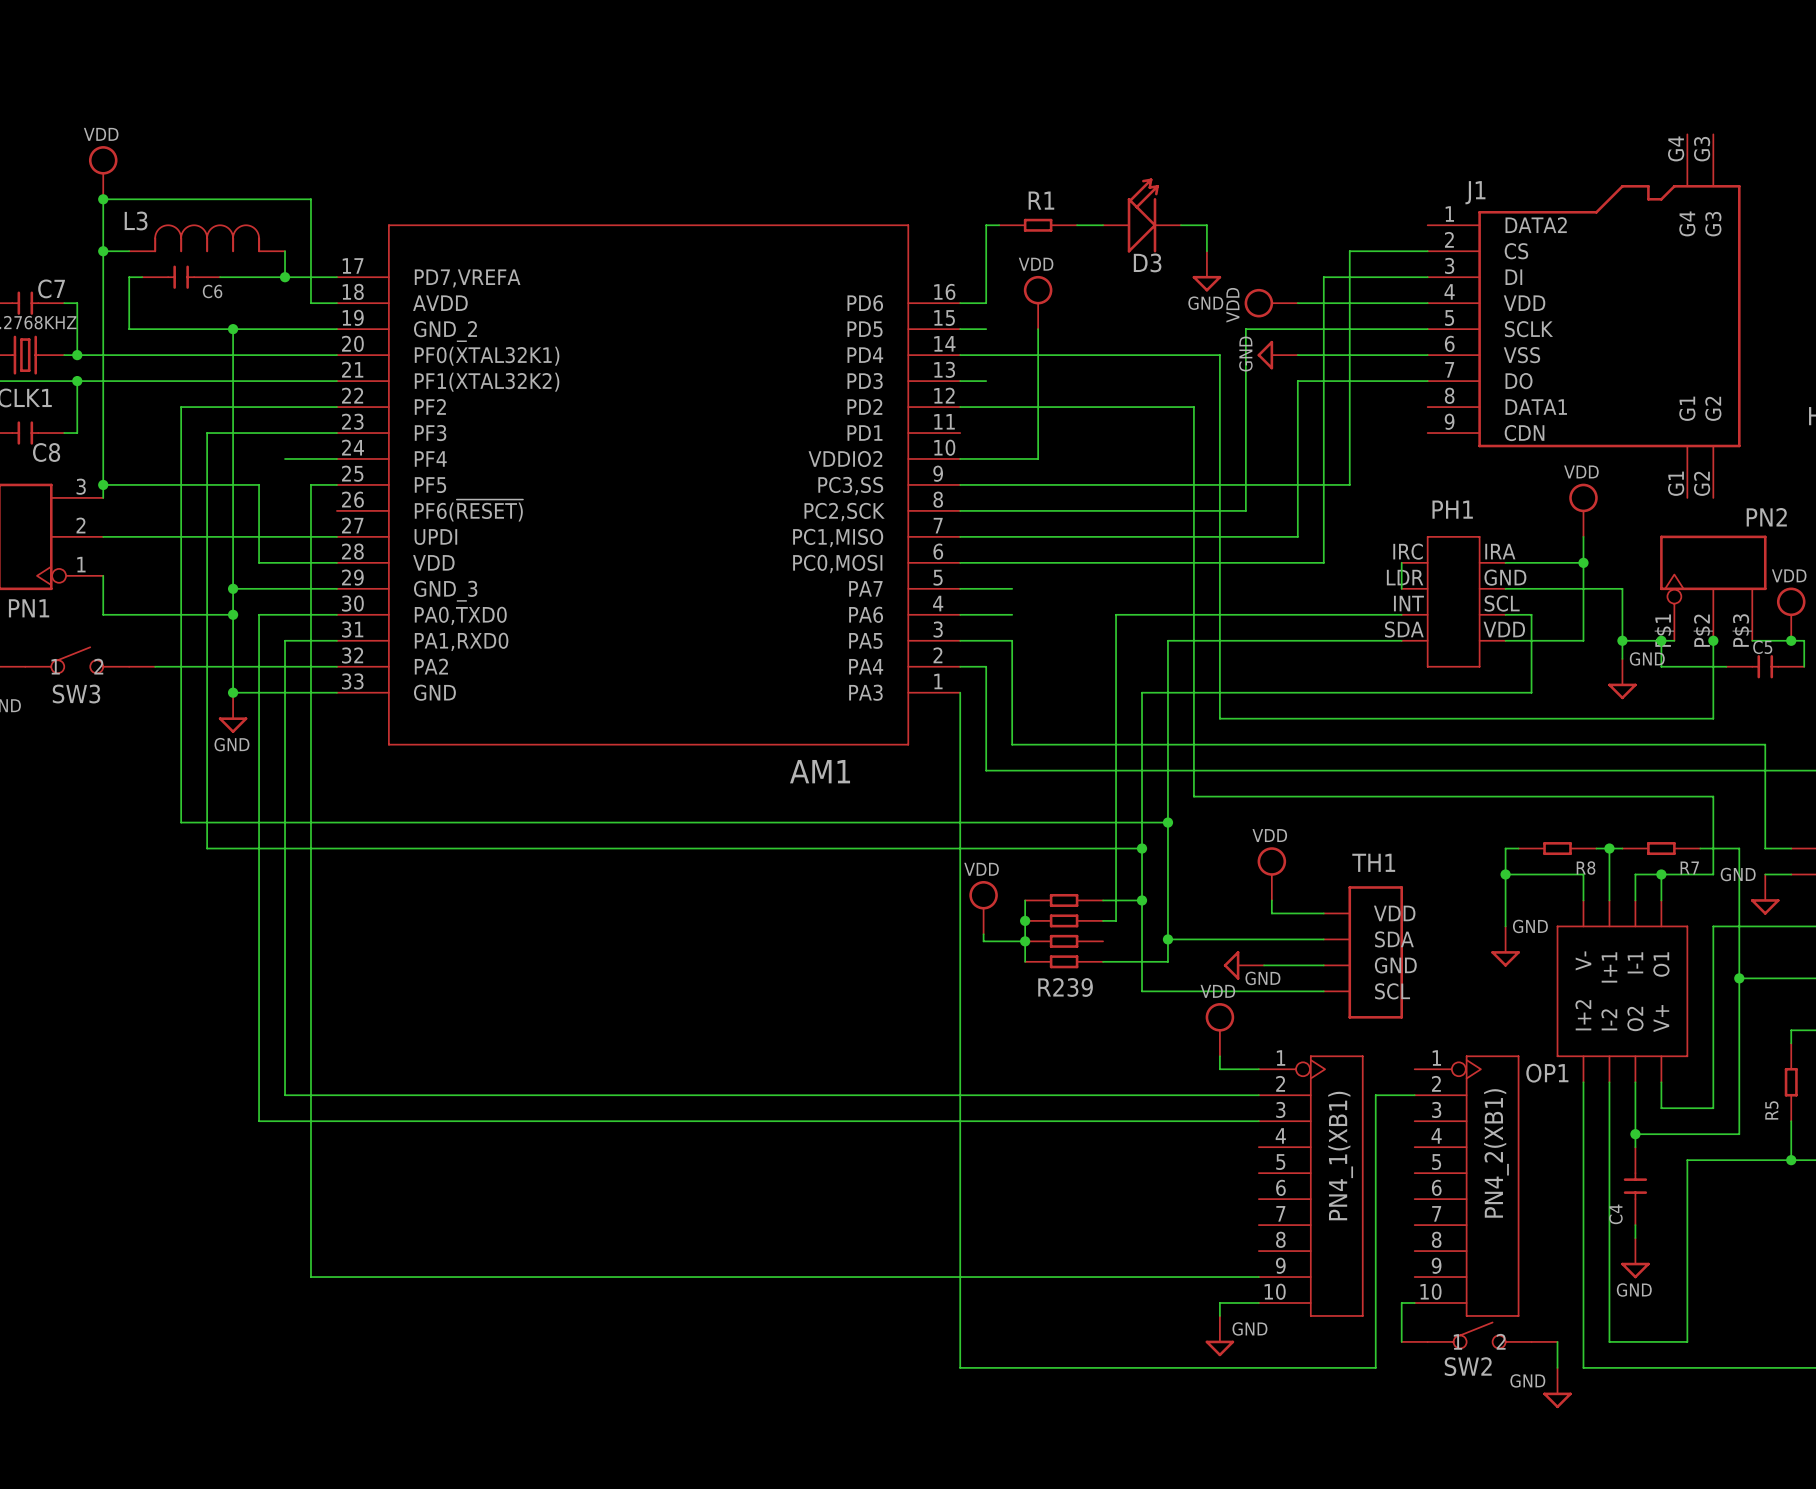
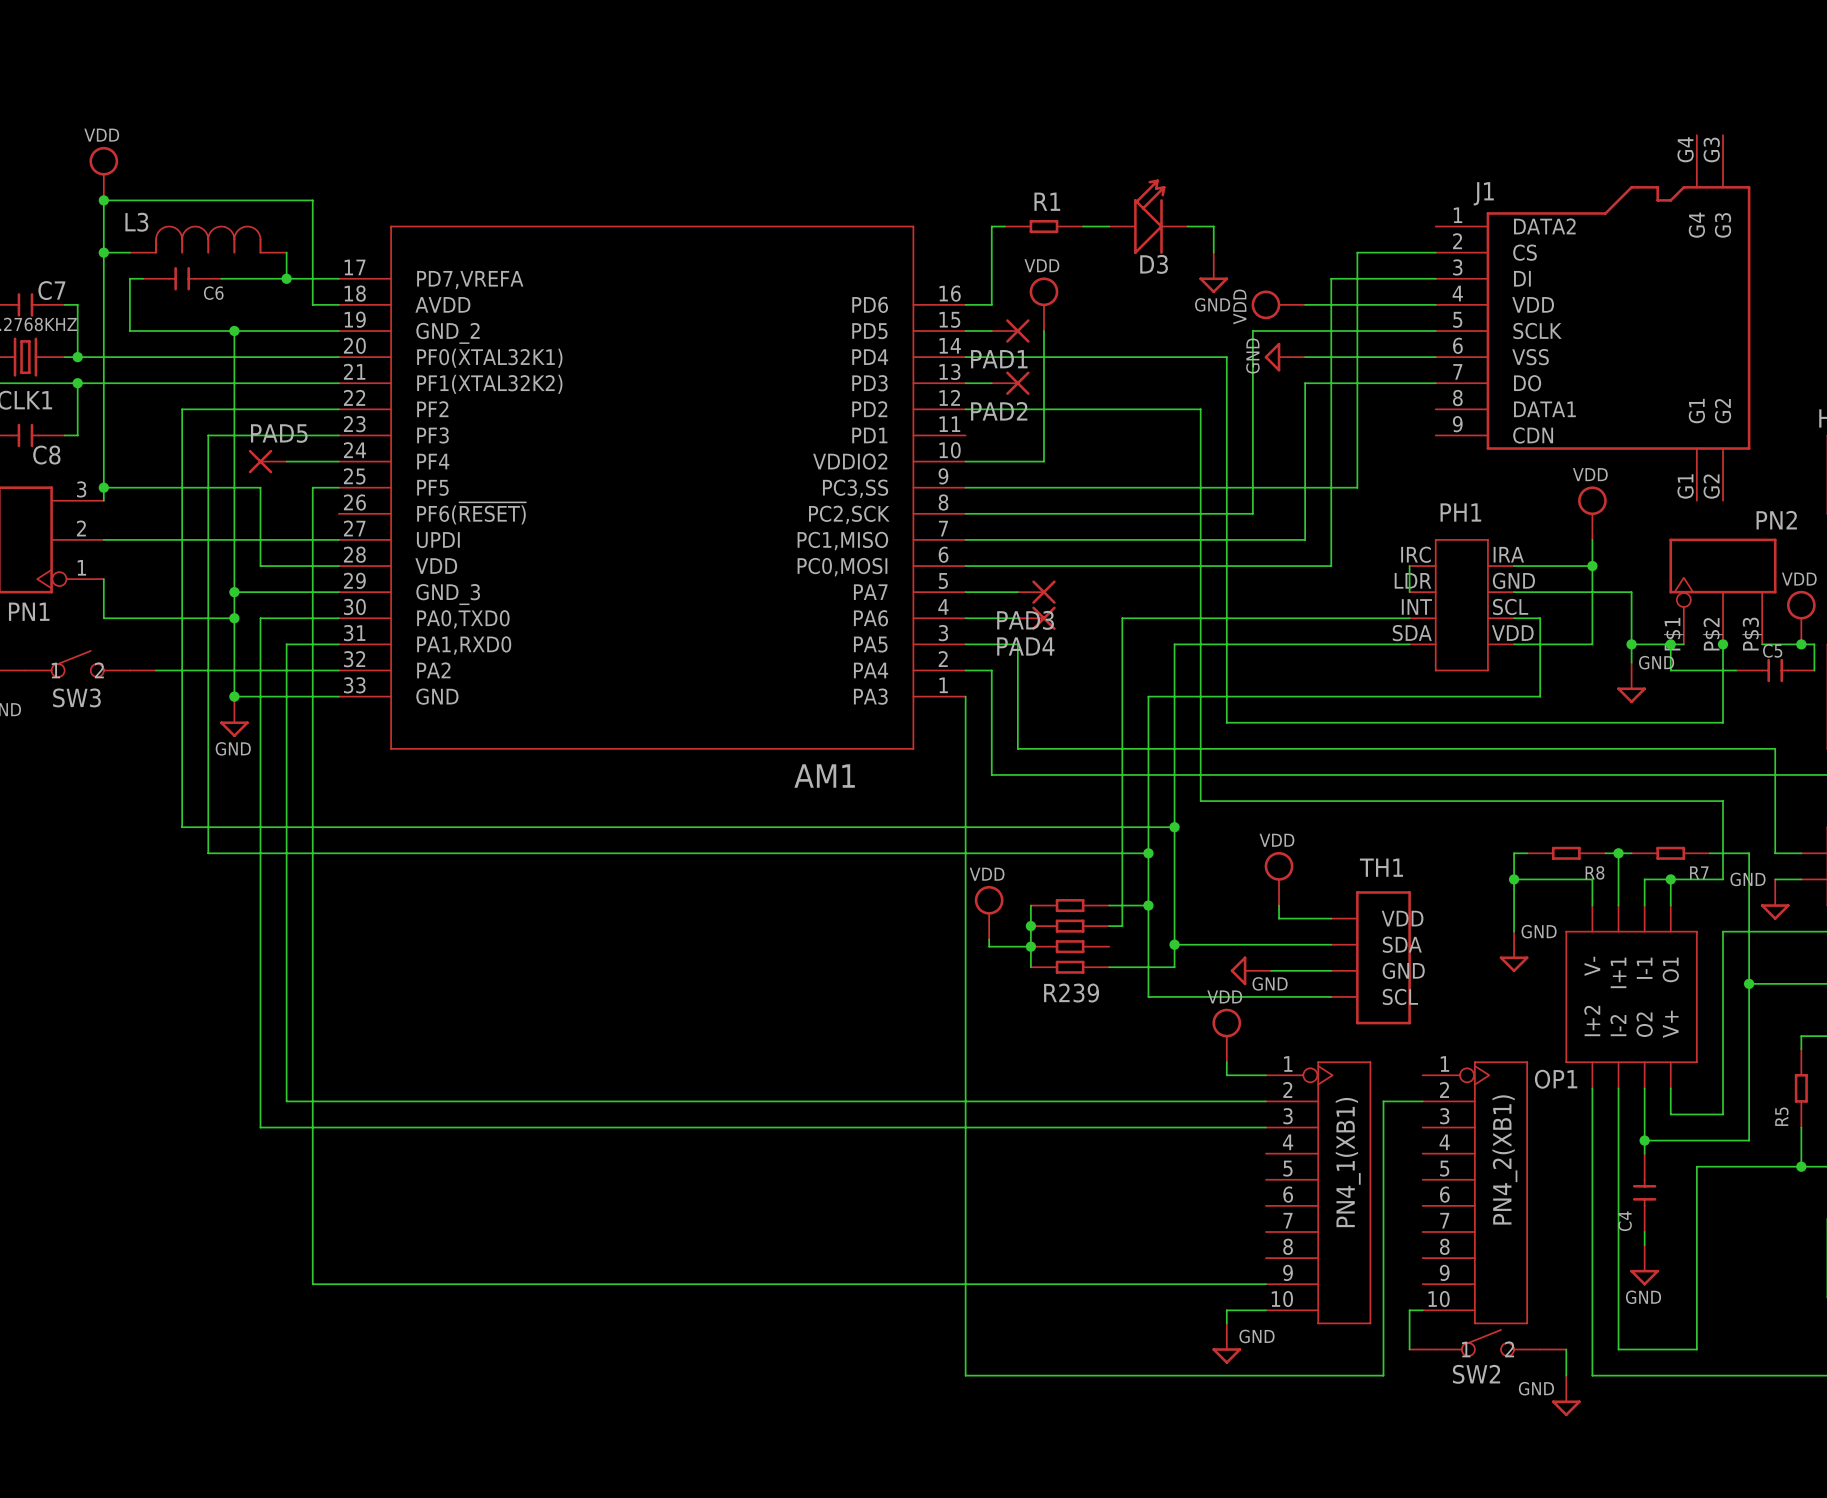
PAD1: none -> (1010, 331)
PAD2: none -> (1010, 383)
PAD5: none -> (267, 461)
PAD3: none -> (1036, 592)
PAD4: none -> (1036, 618)

